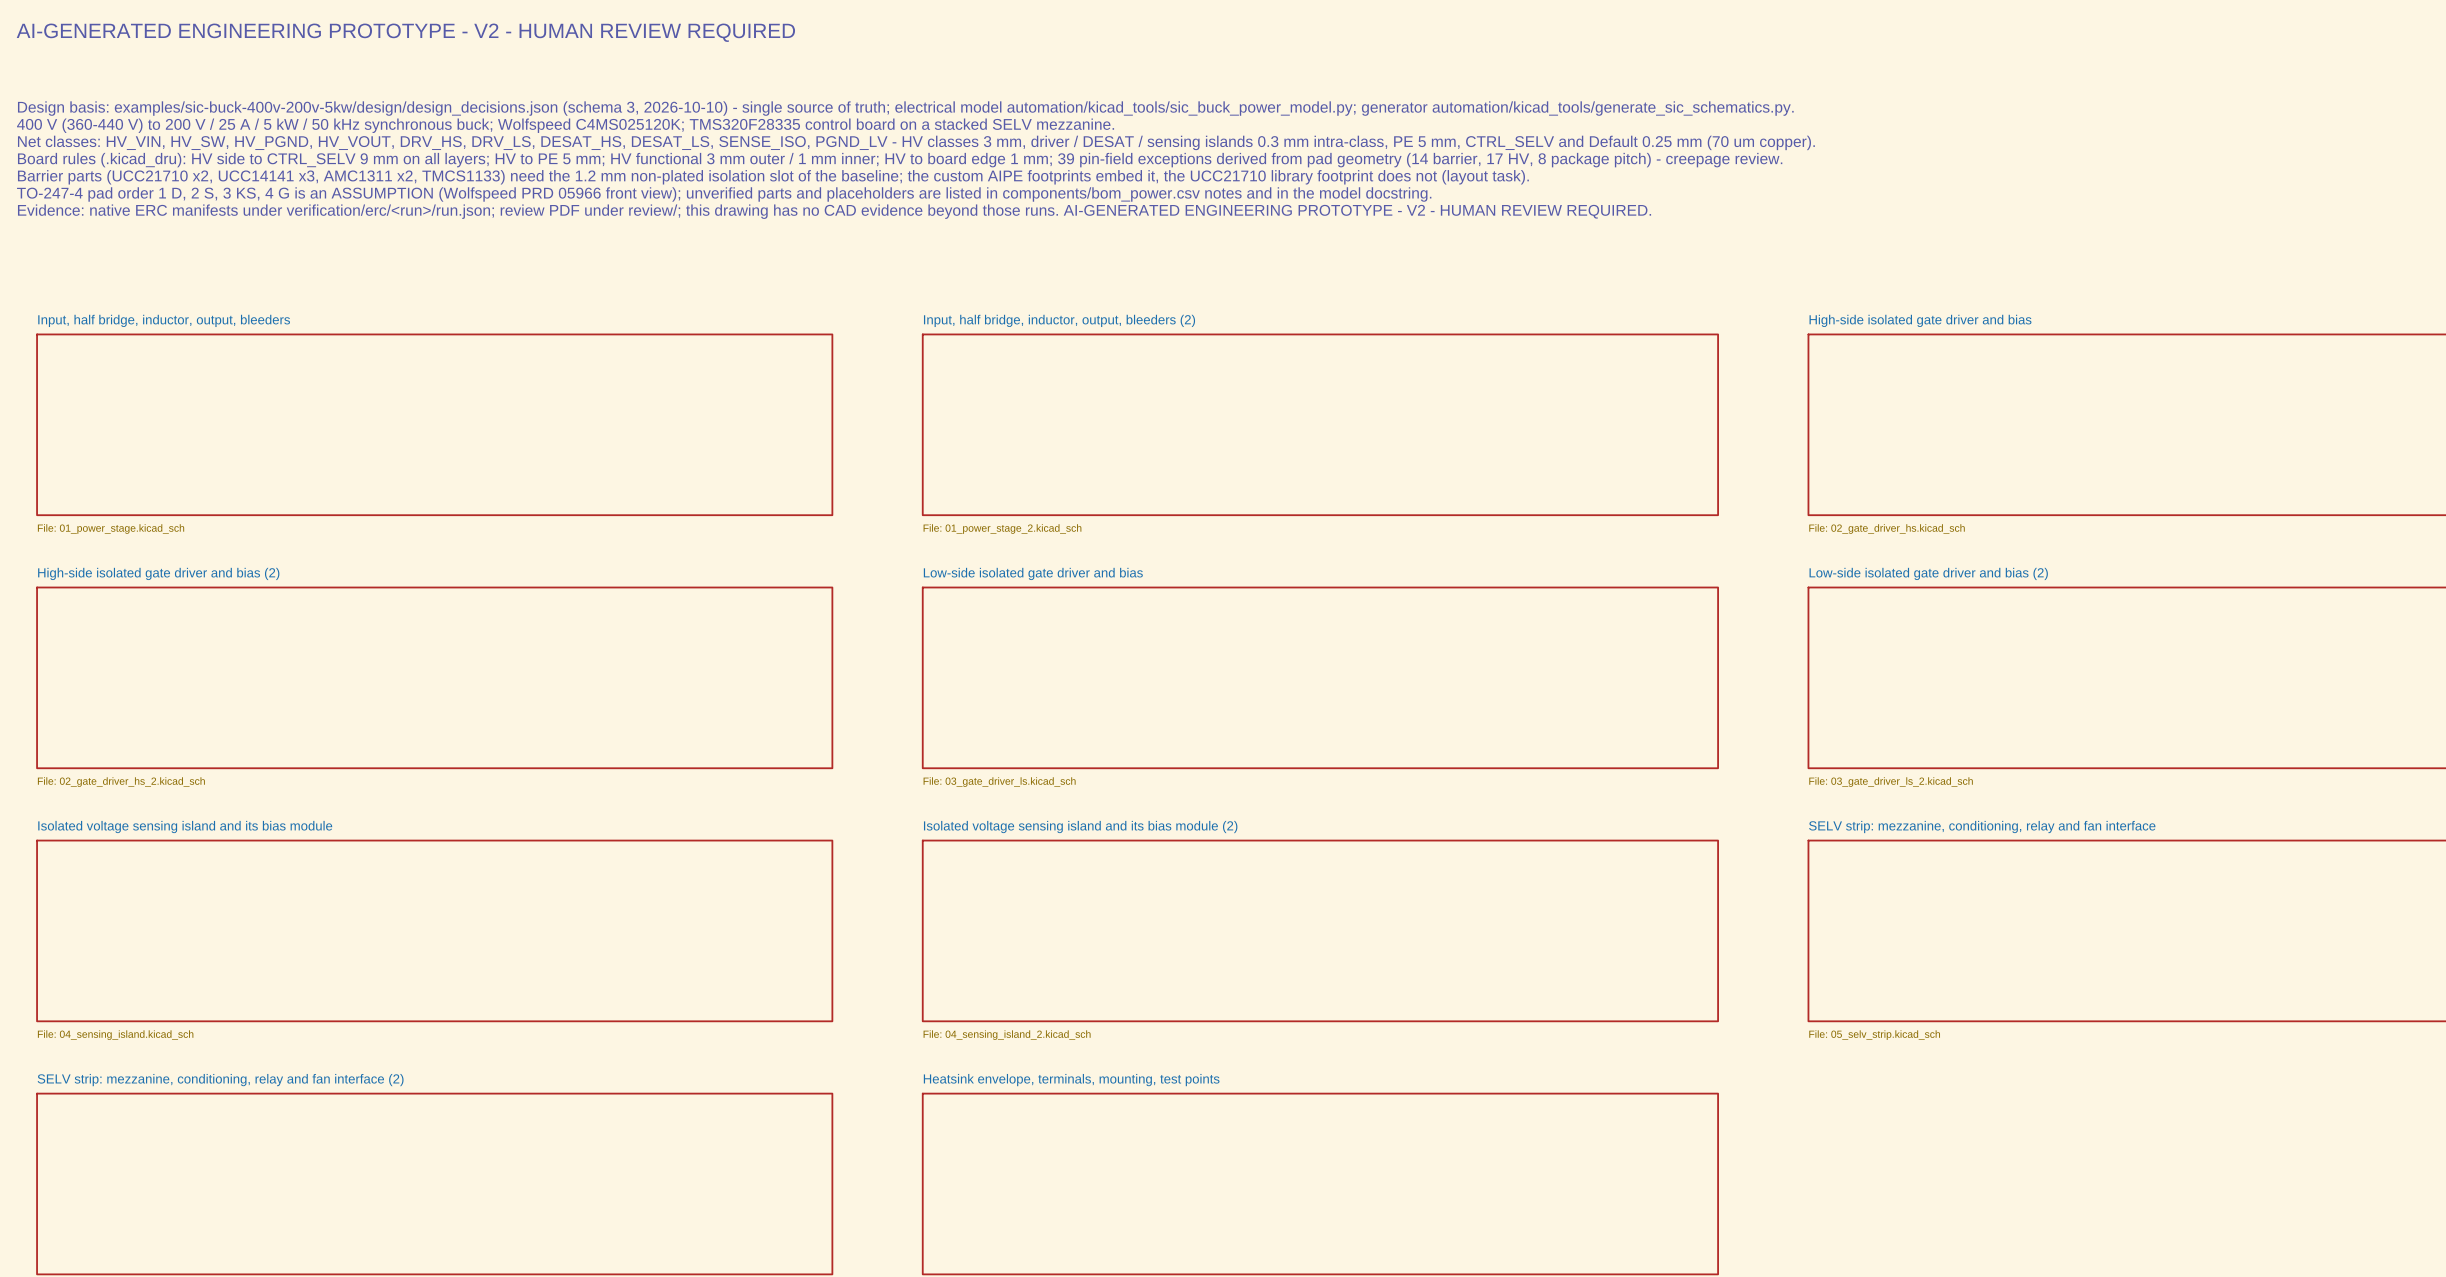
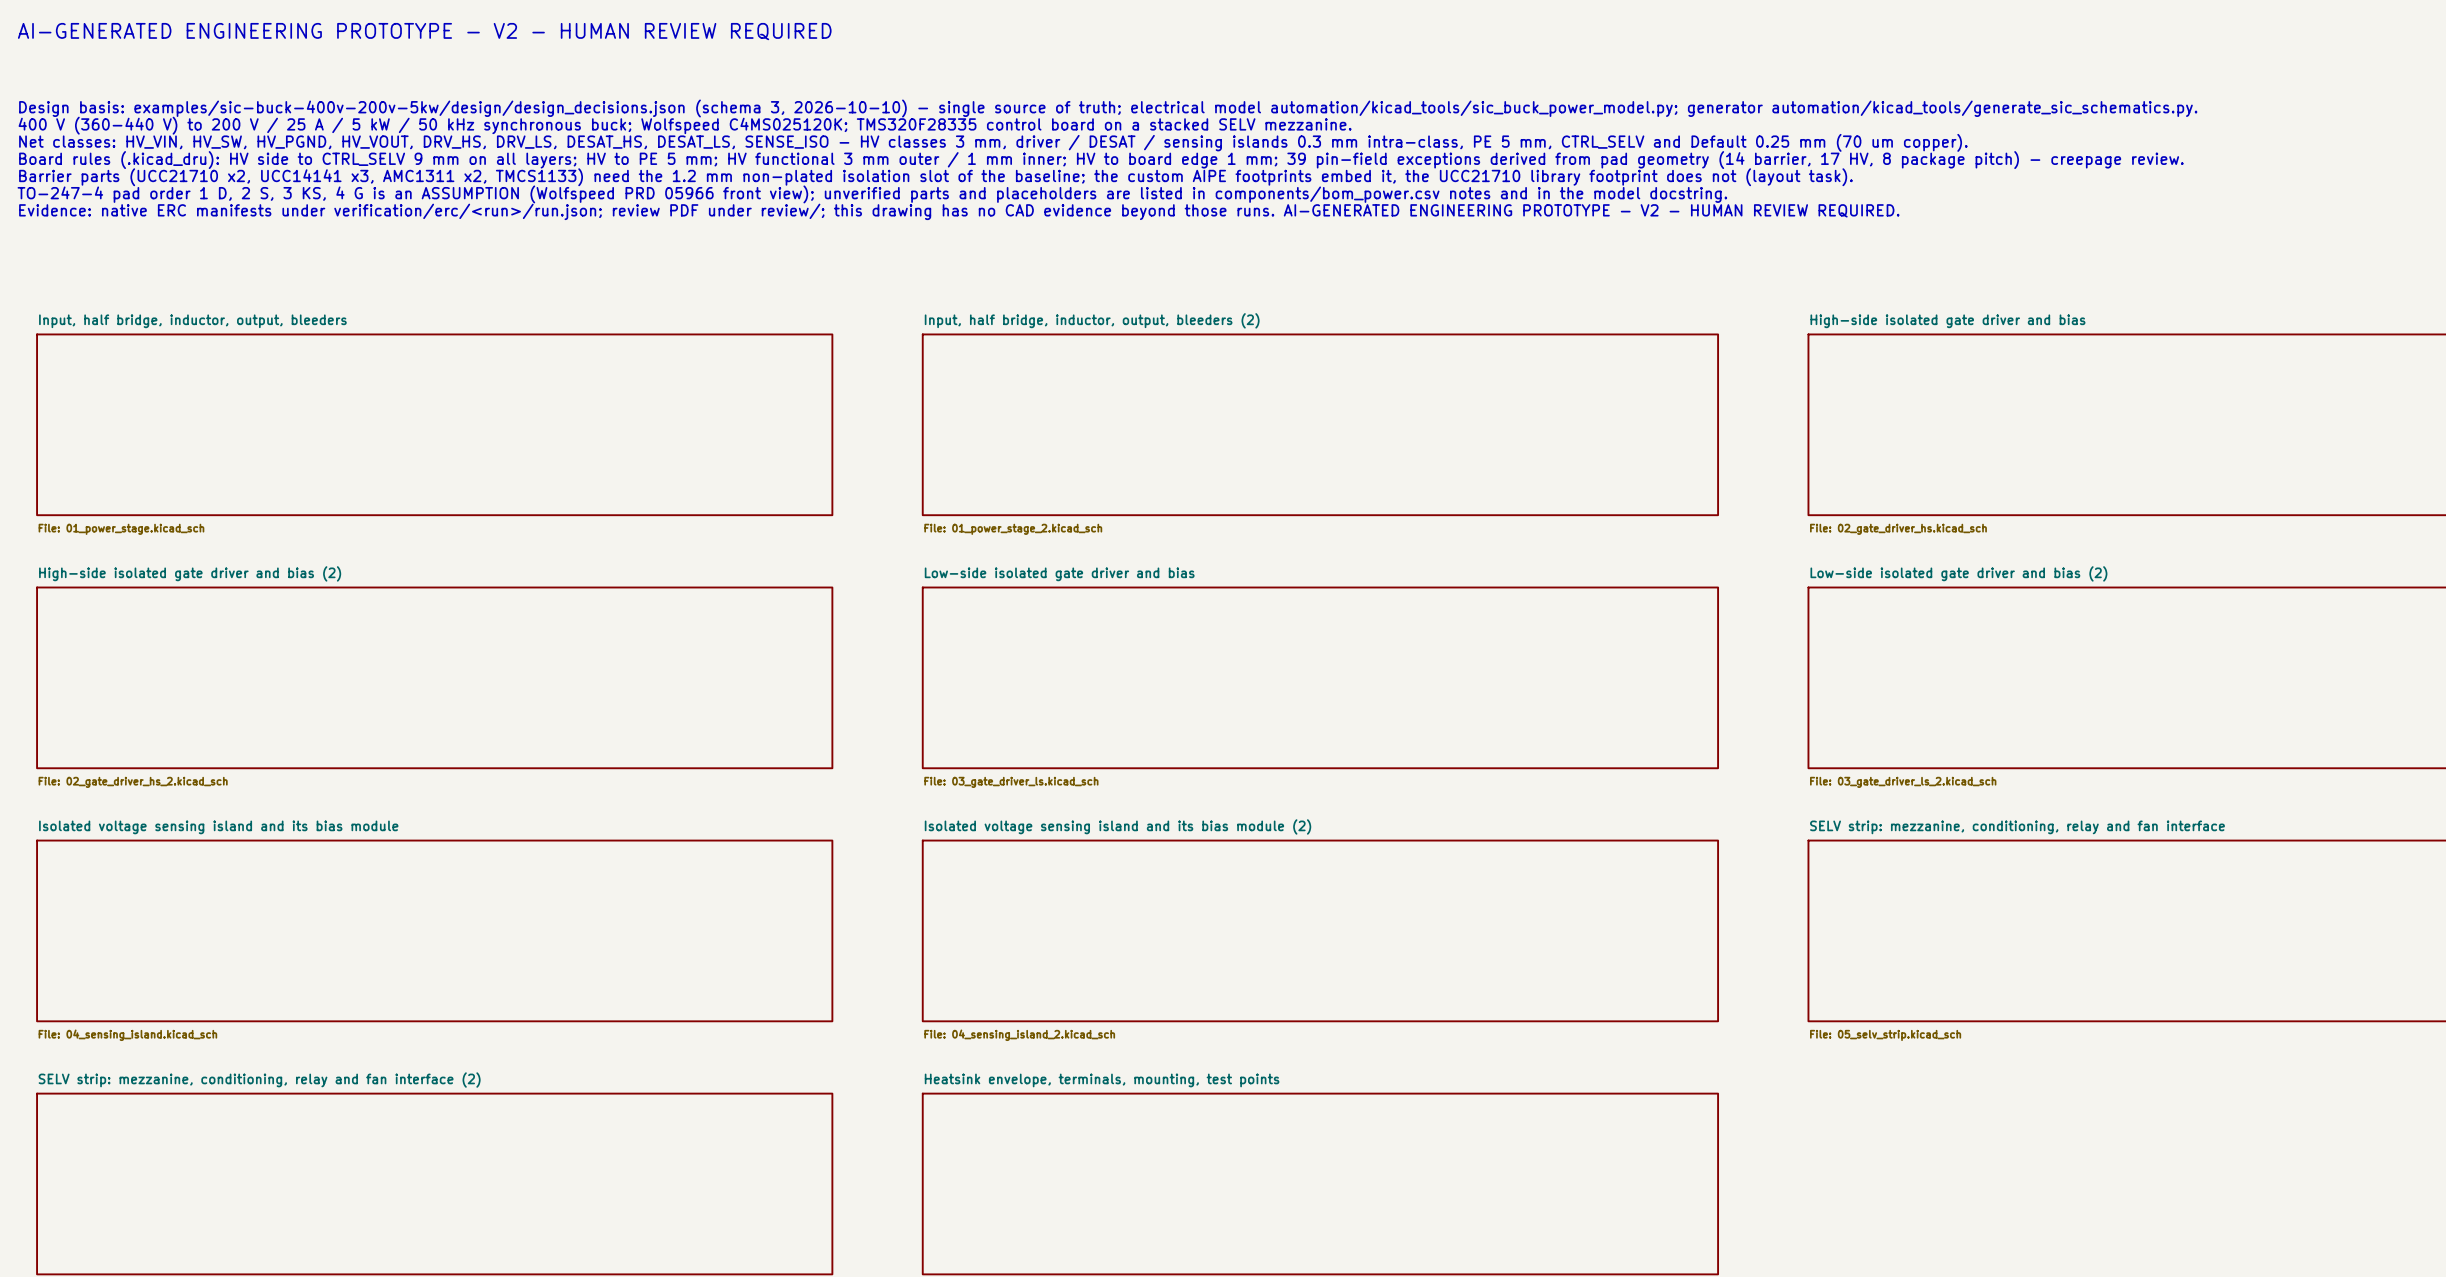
text: Net classes: HV_VIN, HV_SW, HV_PGND, HV_VOUT, DRV_HS, DRV_LS, DESAT_HS, DESAT_LS, SENSE_ISO, PGND_LV - HV classes 3 mm, driver / DESAT / sensing islands 0.3 mm intra-class, PE 5 mm, CTRL_SELV and Default 0.25 mm (70 um copper). (916, 142) -> Net classes: HV_VIN, HV_SW, HV_PGND, HV_VOUT, DRV_HS, DRV_LS, DESAT_HS, DESAT_LS, SENSE_ISO - HV classes 3 mm, driver / DESAT / sensing islands 0.3 mm intra-class, PE 5 mm, CTRL_SELV and Default 0.25 mm (70 um copper). (993, 142)

